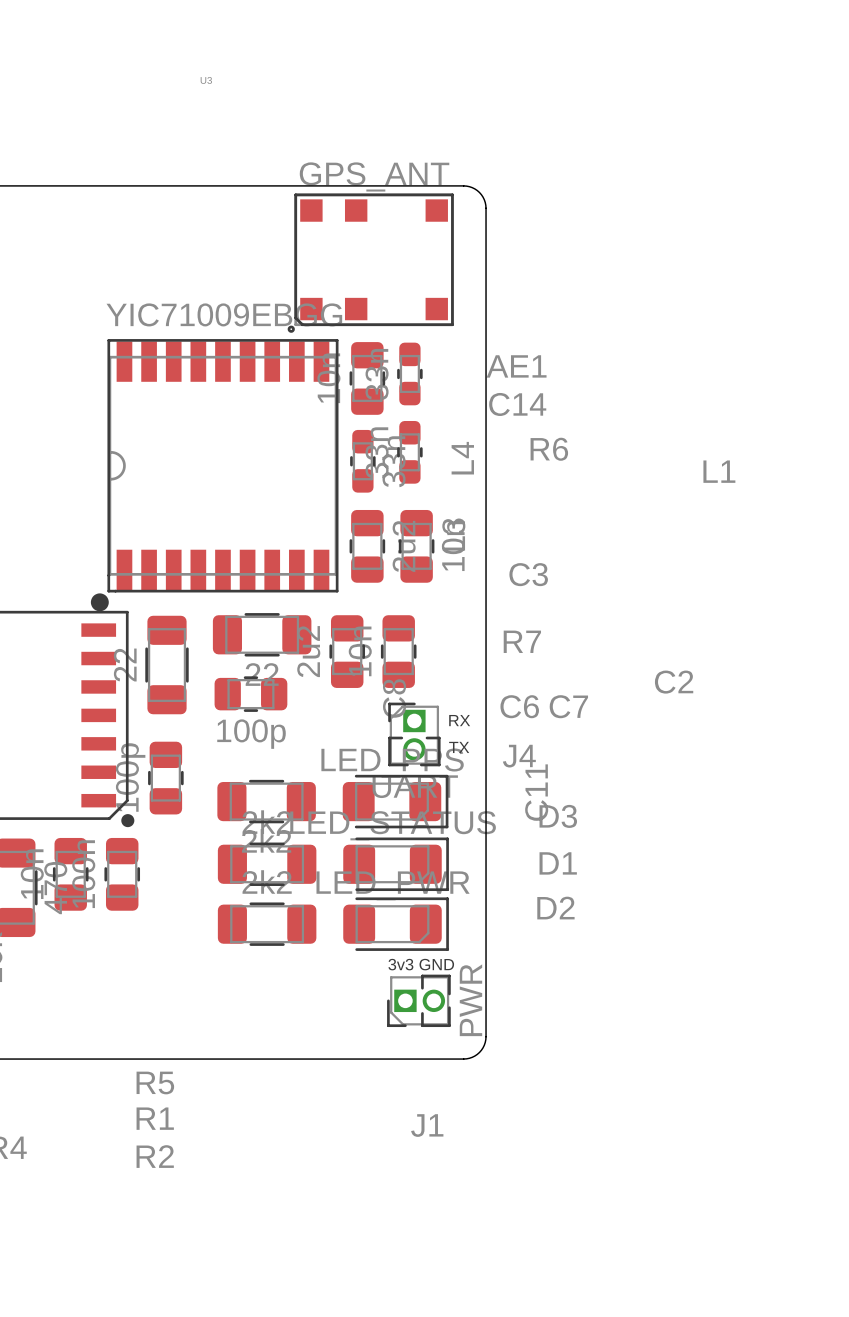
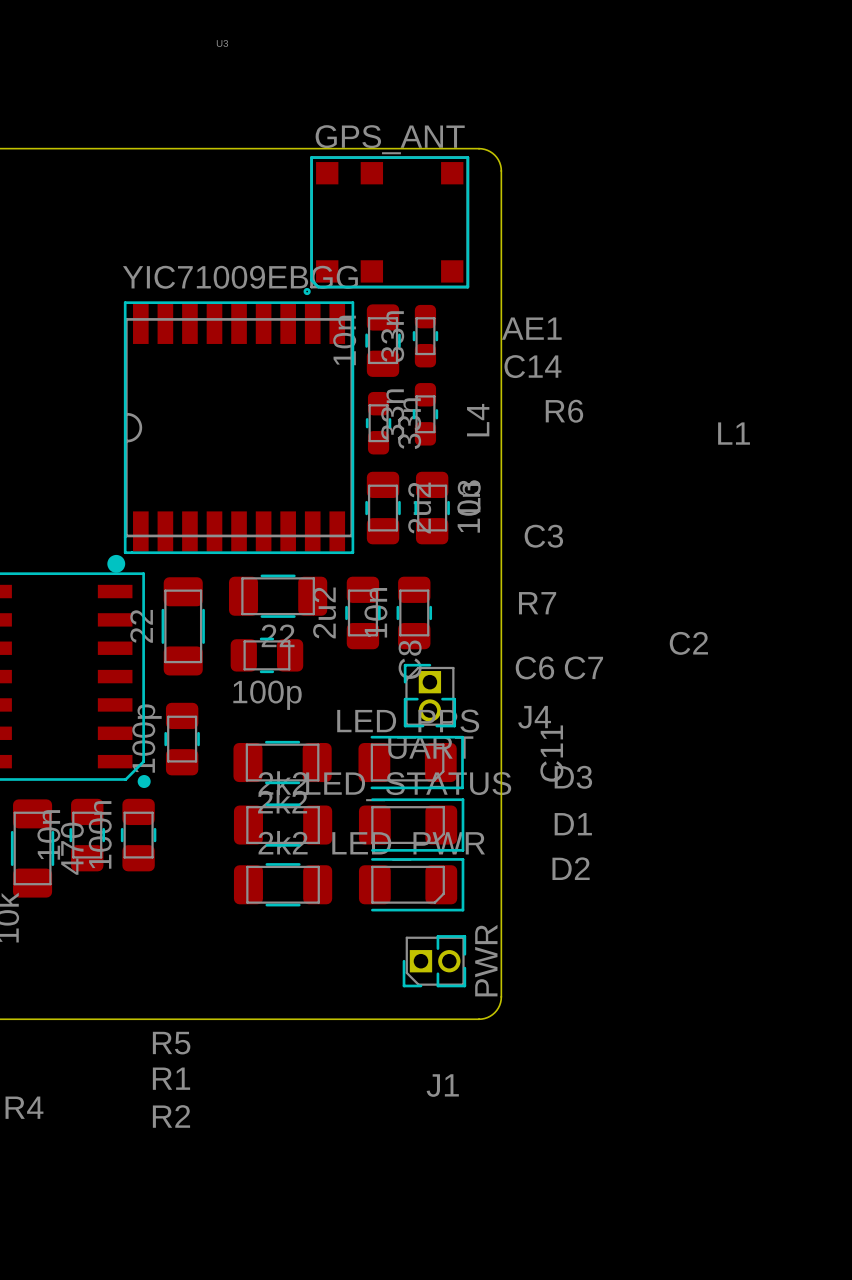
text: RX (459, 720) -> none
text: TX (459, 747) -> none
text: 3v3 (400, 964) -> none
text: GND (436, 964) -> none

